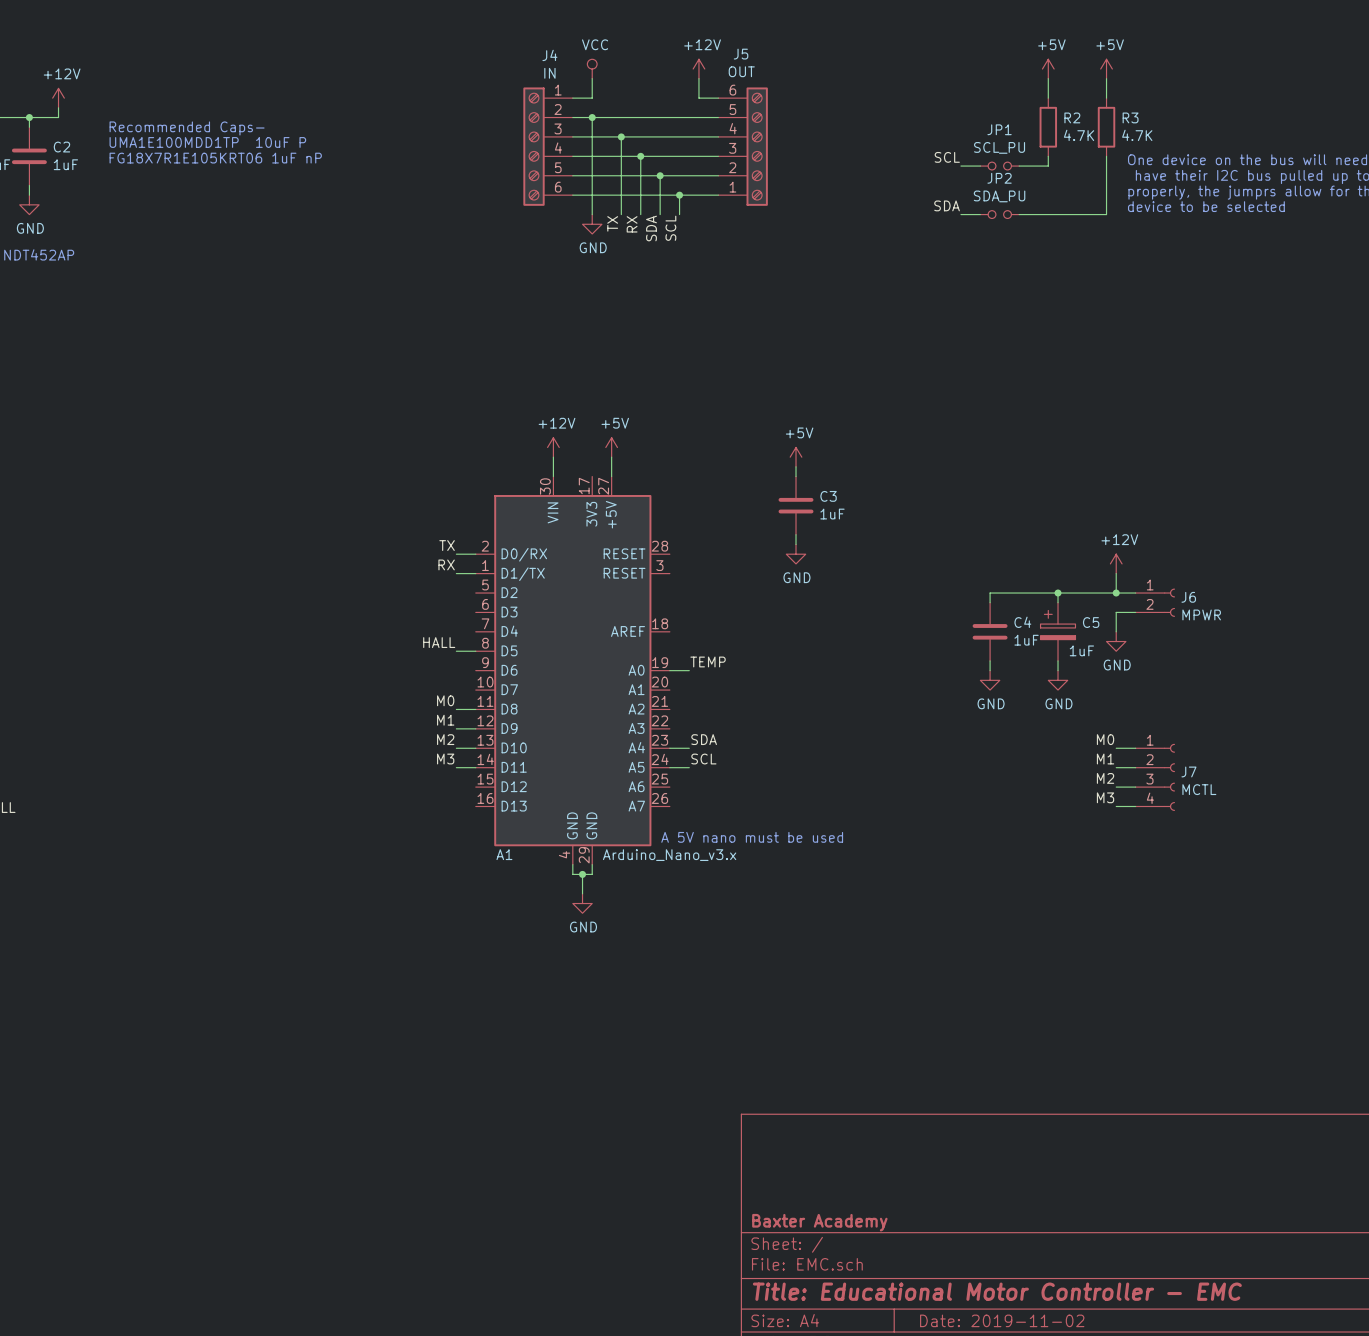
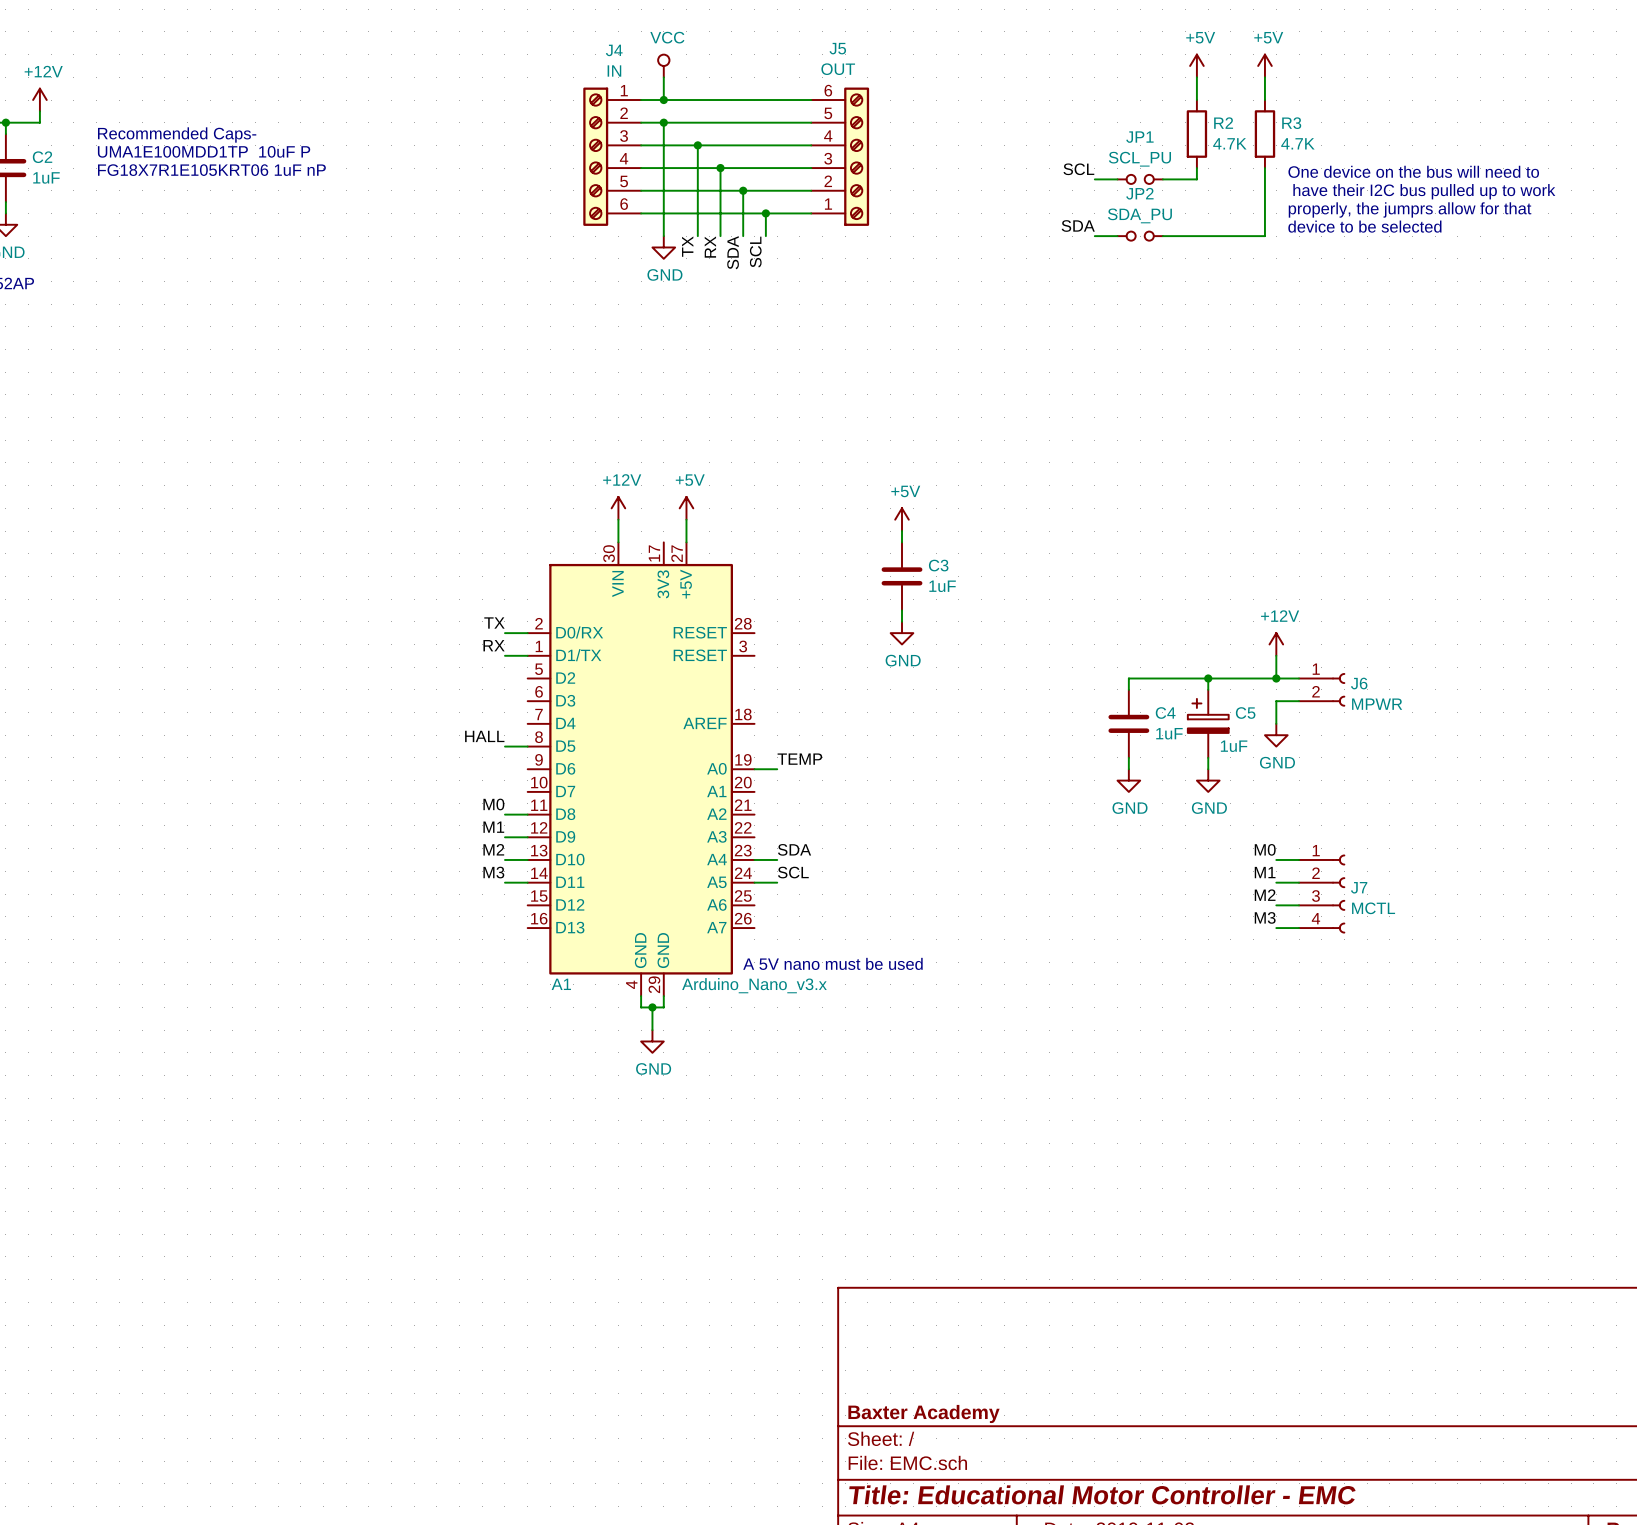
power symbol: +12V (698, 69) -> none
wire: (698, 78) (698, 98) -> (663, 100) (788, 100)
junction: none -> (663, 100)

